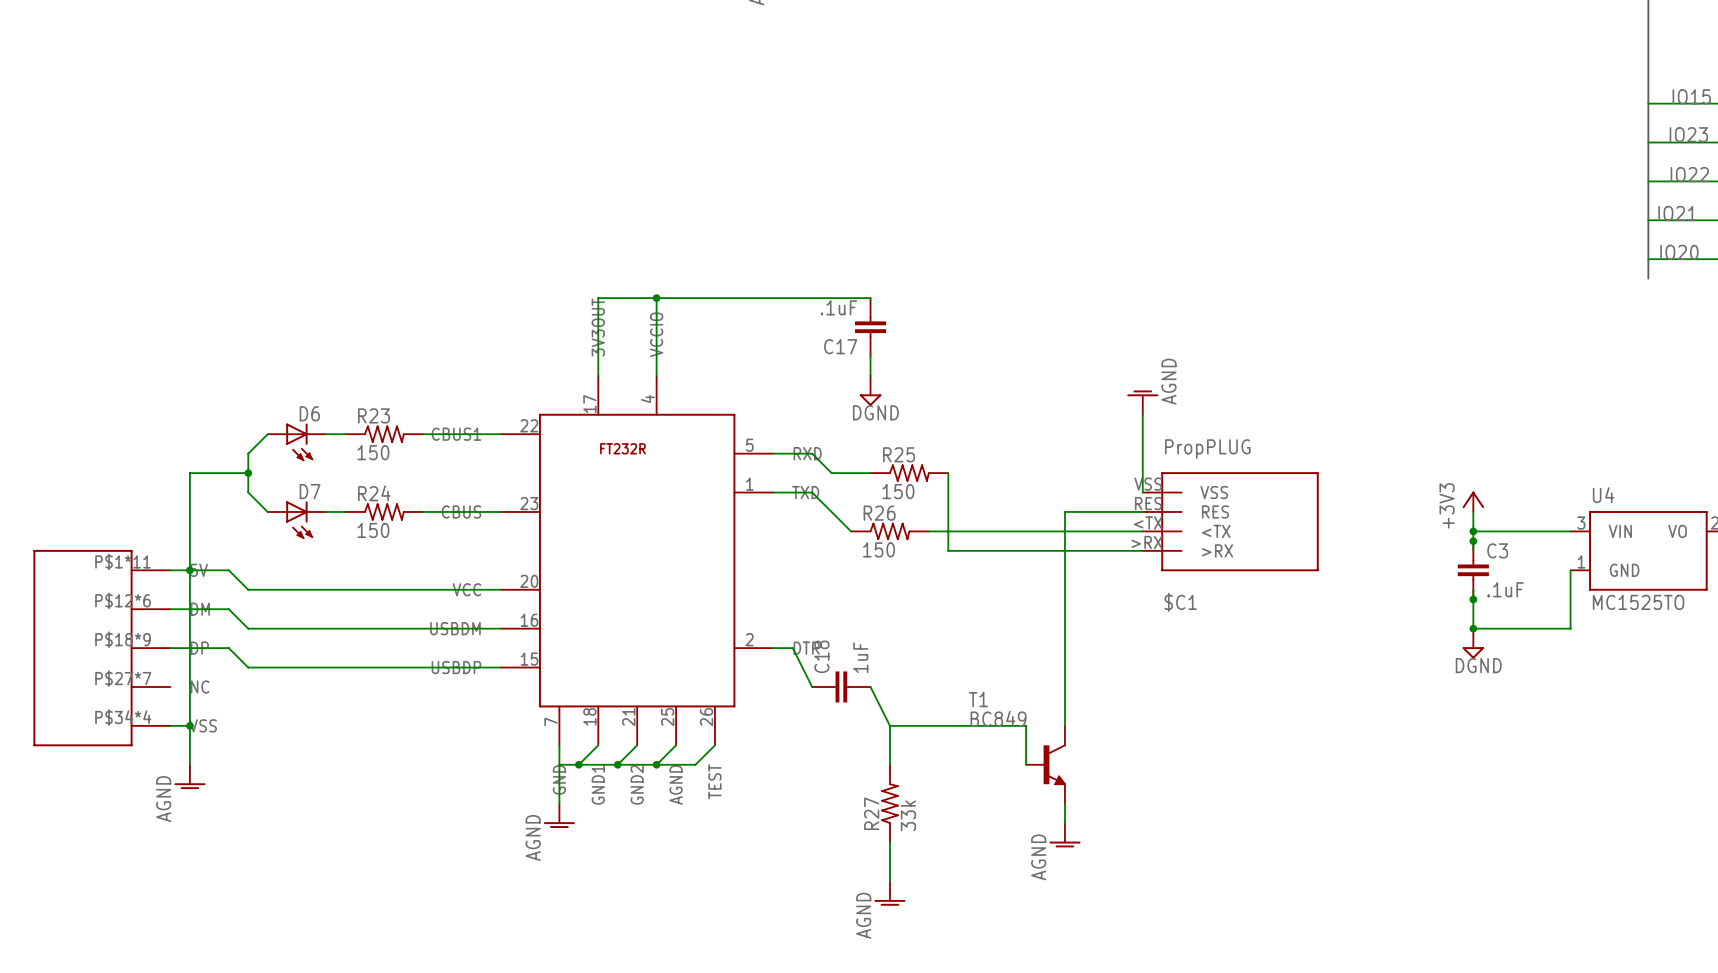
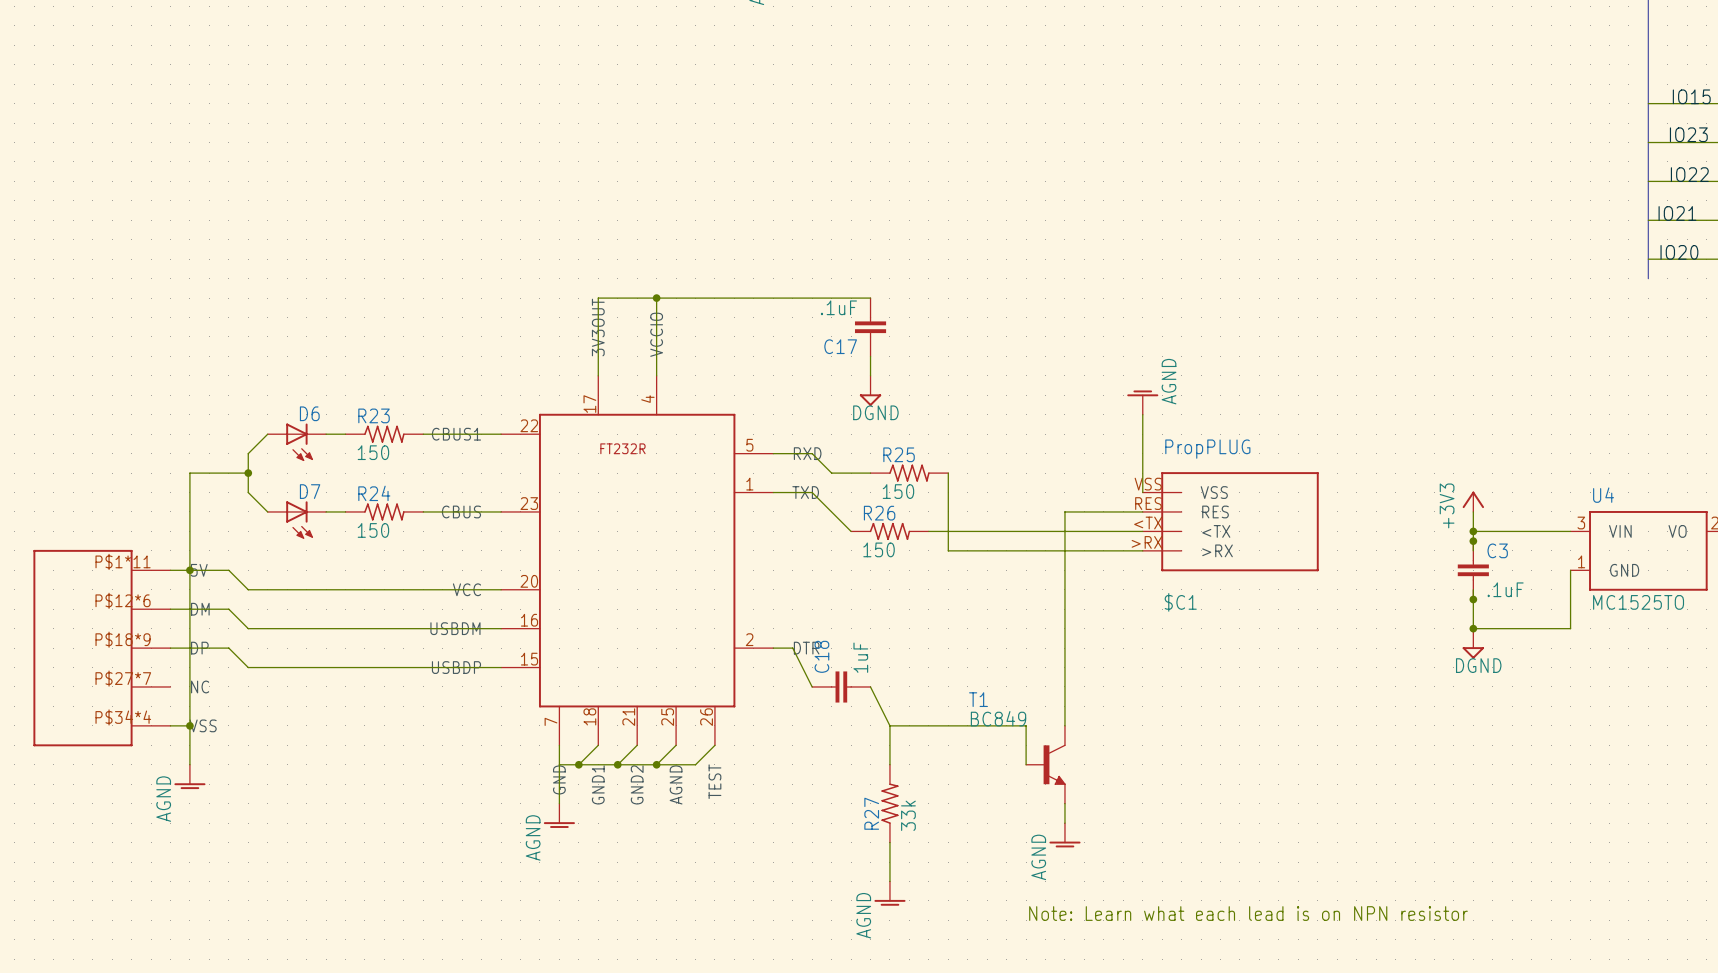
text: none -> Note: Learn what each lead is on NPN resistor (1248, 913)

